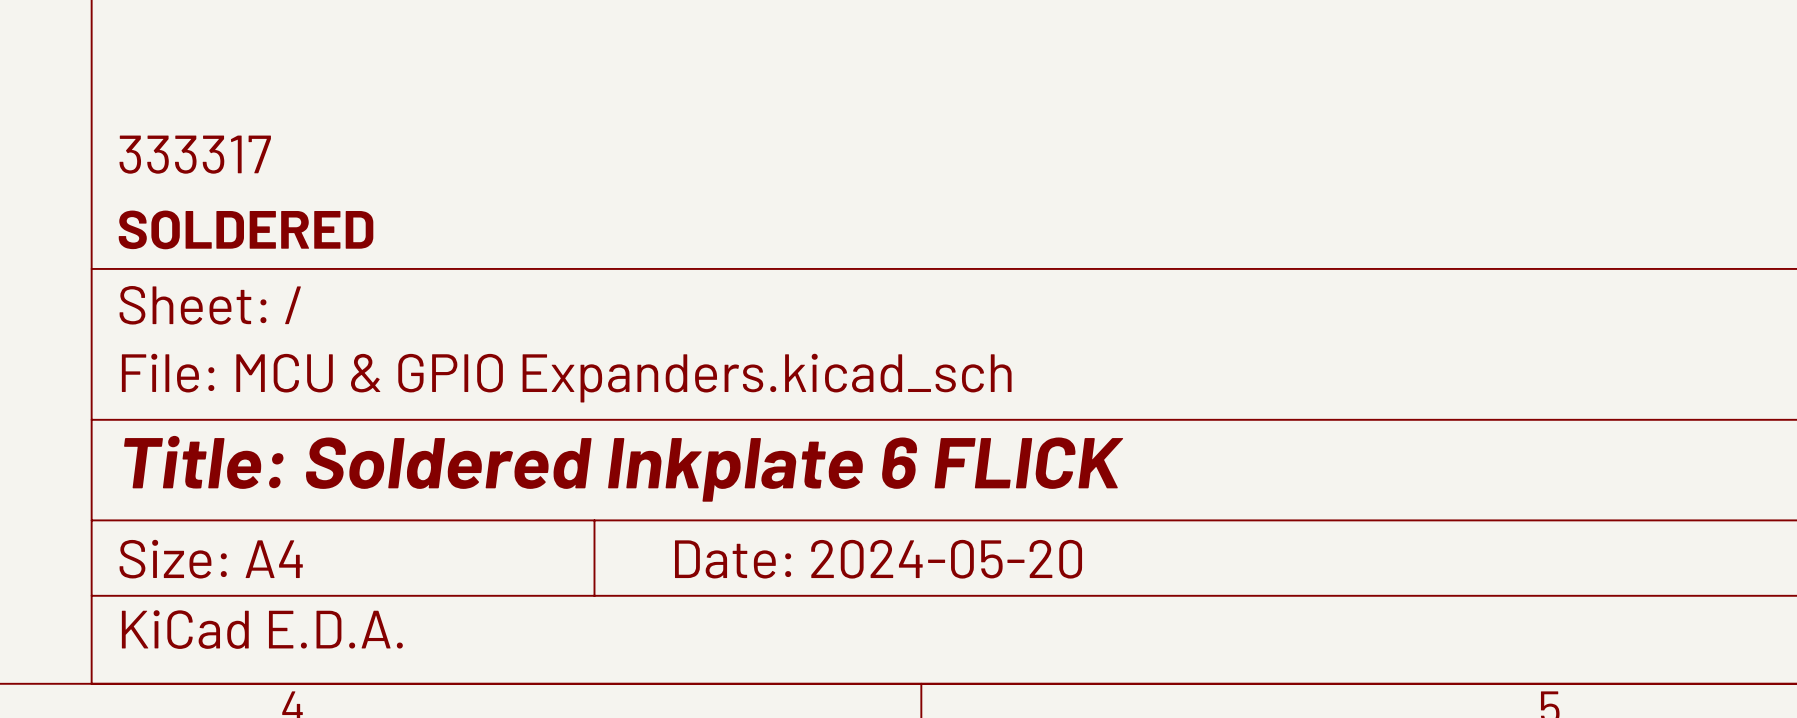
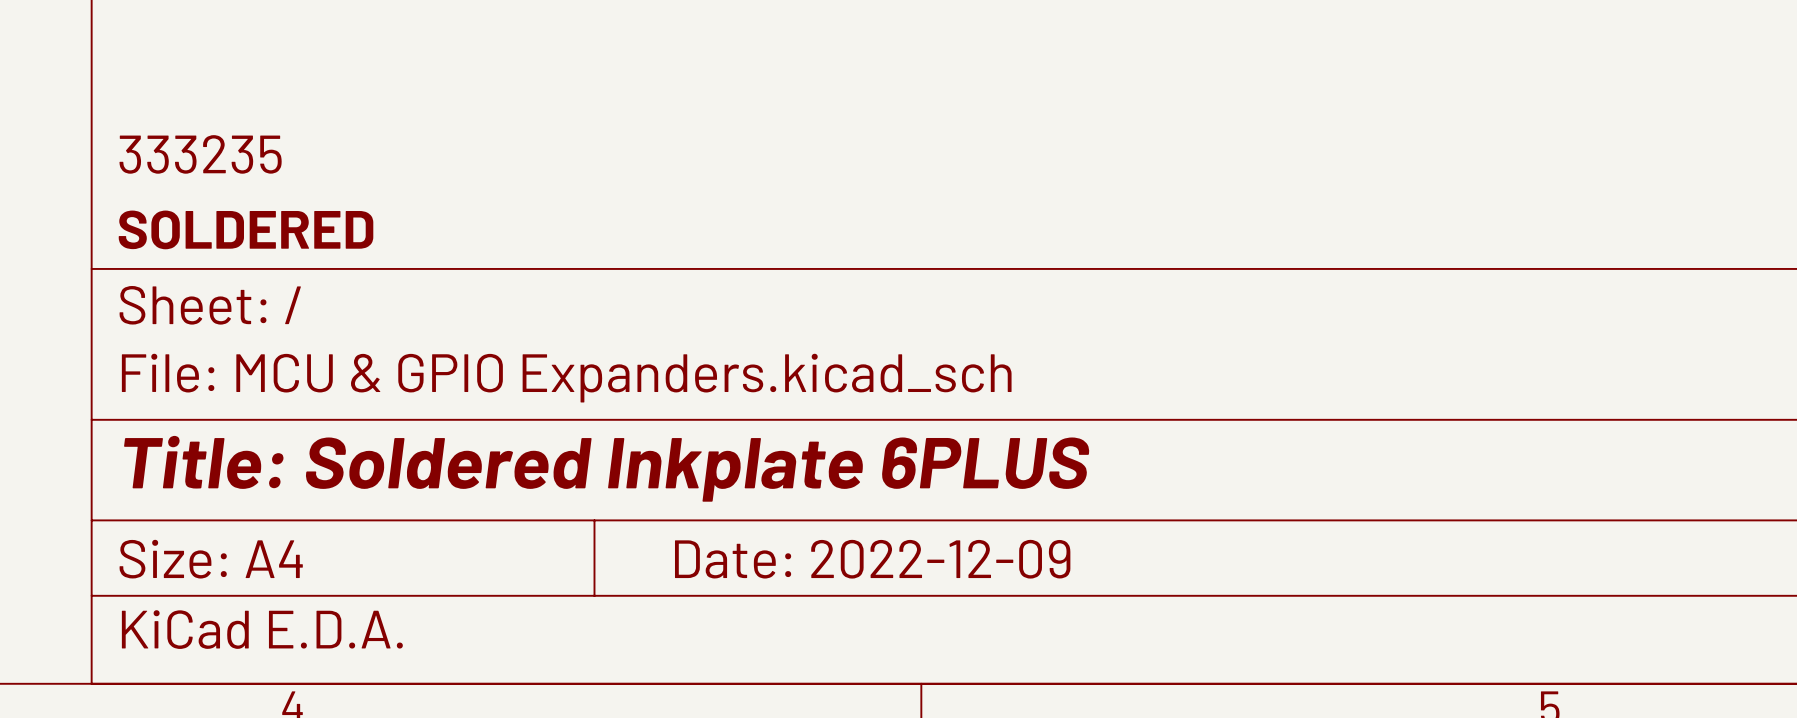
title block: 333317 (195, 154) -> 333235 (200, 154)
title block: Title: Soldered Inkplate 6 FLICK (623, 468) -> Title: Soldered Inkplate 6PLUS (606, 468)
title block: Date: 2024-05-20 (878, 559) -> Date: 2022-12-09 (872, 559)

